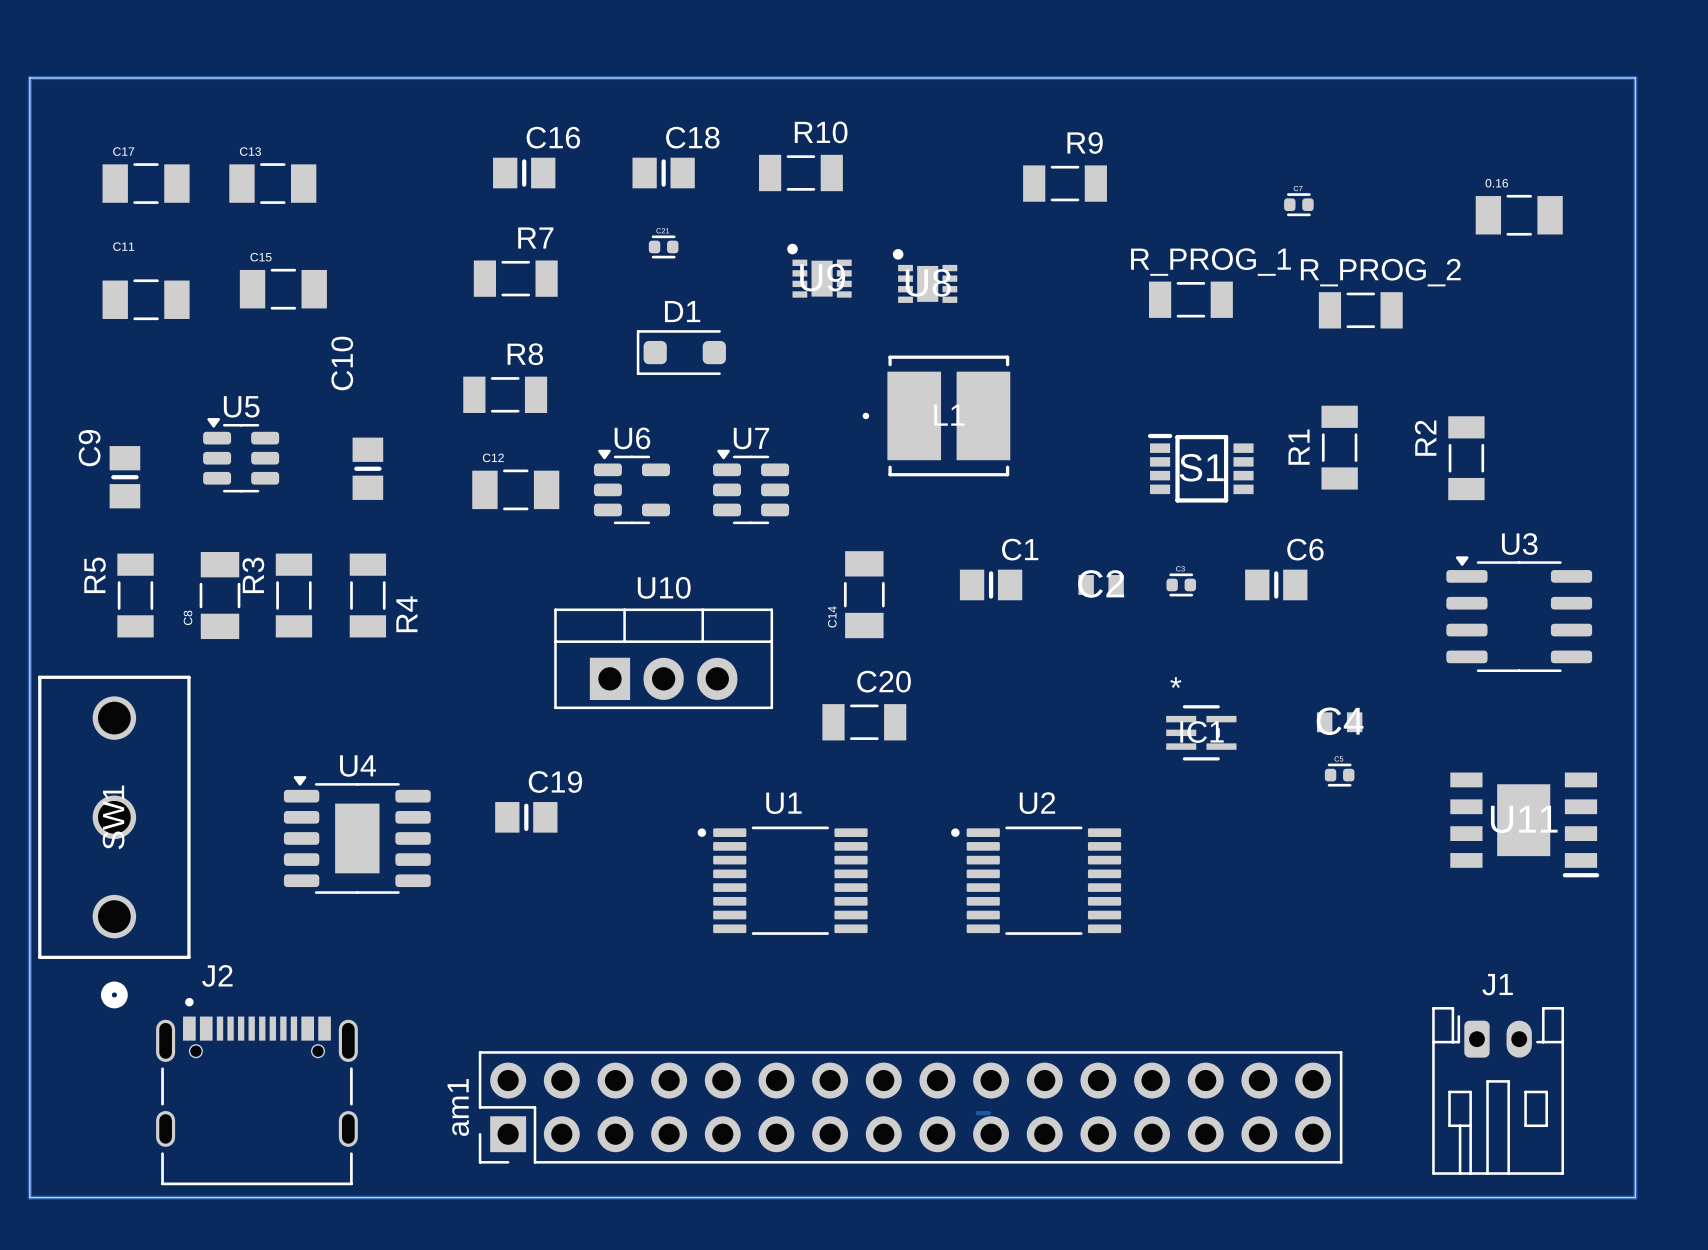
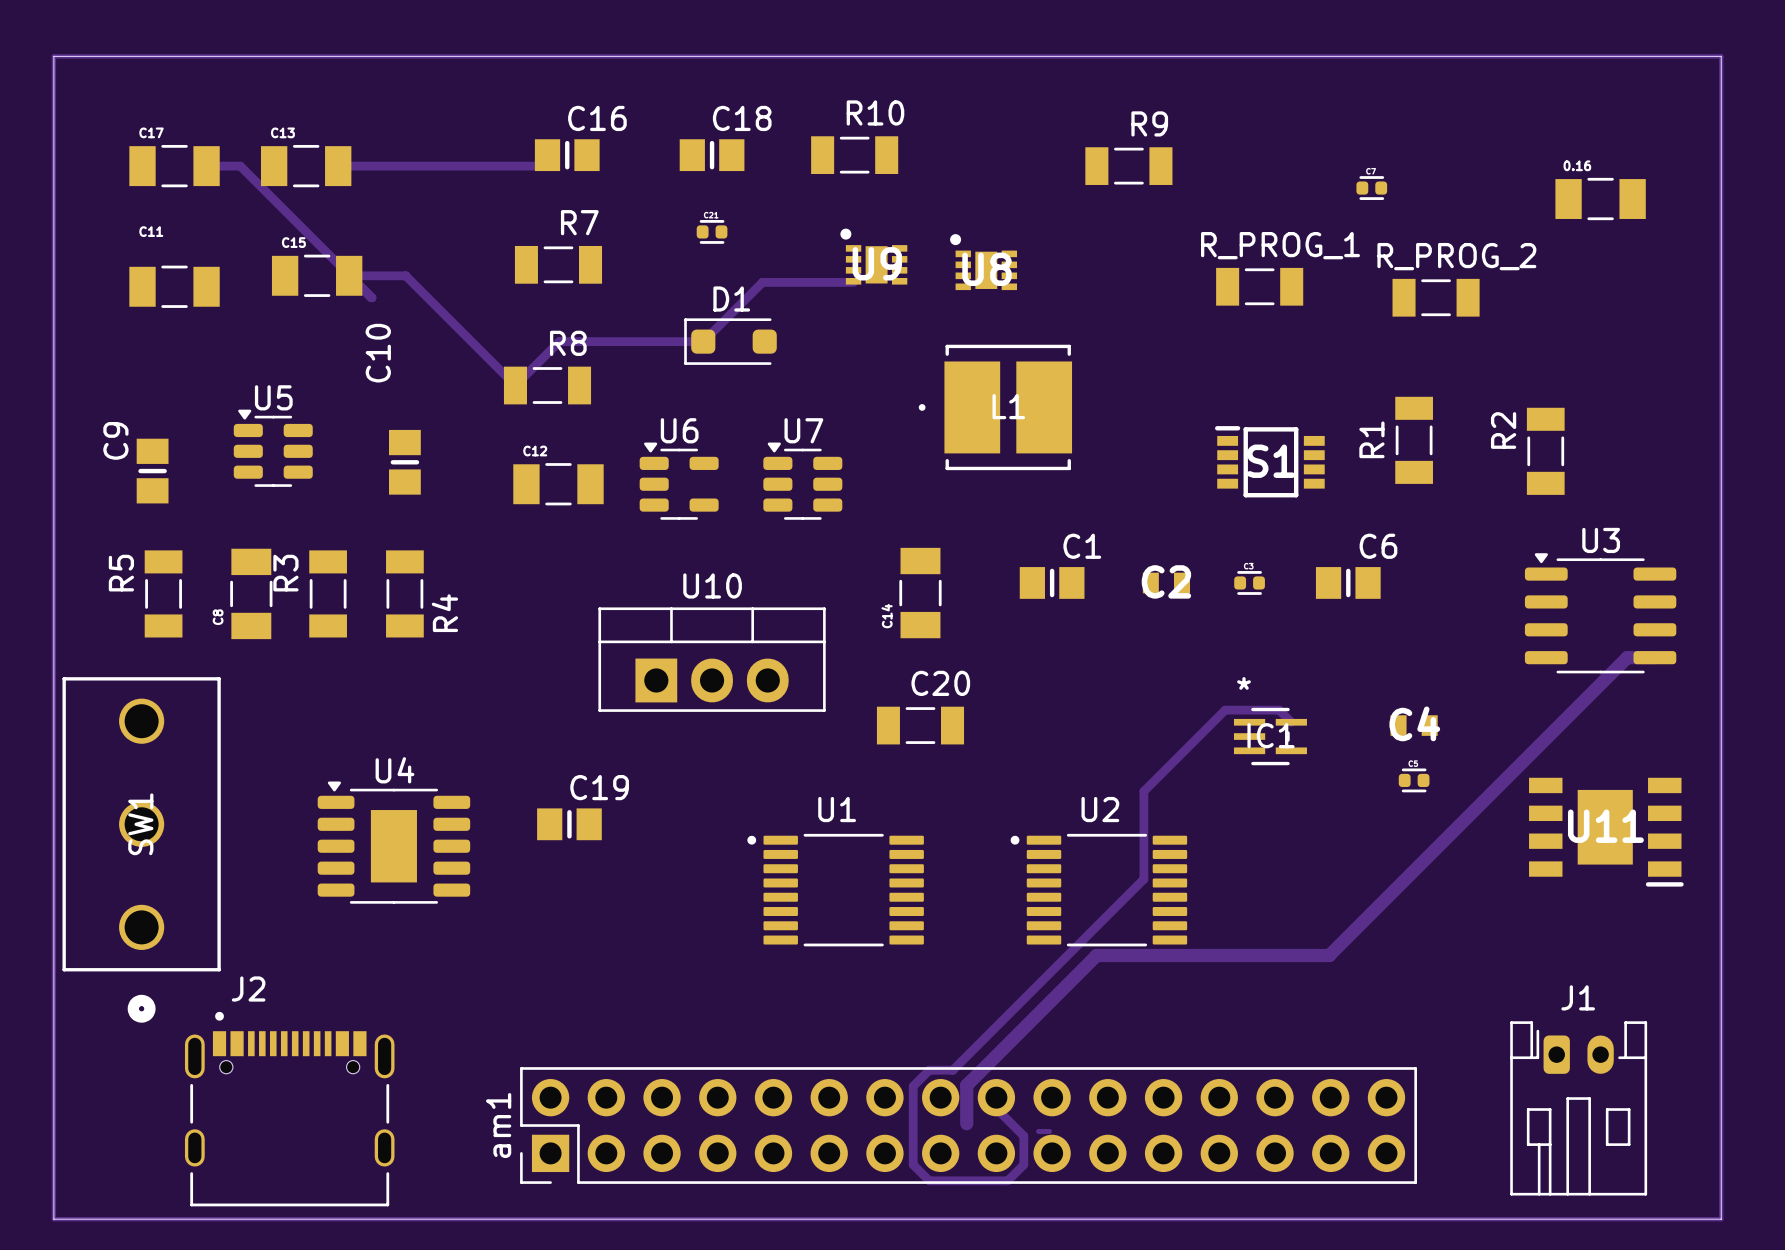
track: none -> (547, 155) (536, 166) (338, 166)
track: none -> (206, 166) (240, 166) (371, 297) (371, 297) (349, 275) (405, 275) (515, 385) (559, 341) (703, 341) (762, 282) (853, 282)
track: none -> (1654, 657) (1627, 657) (1329, 955) (1096, 955) (966, 1085) (966, 1123)
track: none -> (1291, 722) (1279, 710) (1225, 710) (1143, 791) (1143, 879) (952, 1070) (929, 1070) (913, 1086) (913, 1164) (929, 1180) (1007, 1180) (1023, 1164) (1023, 1136) (986, 1098) (996, 1097)

